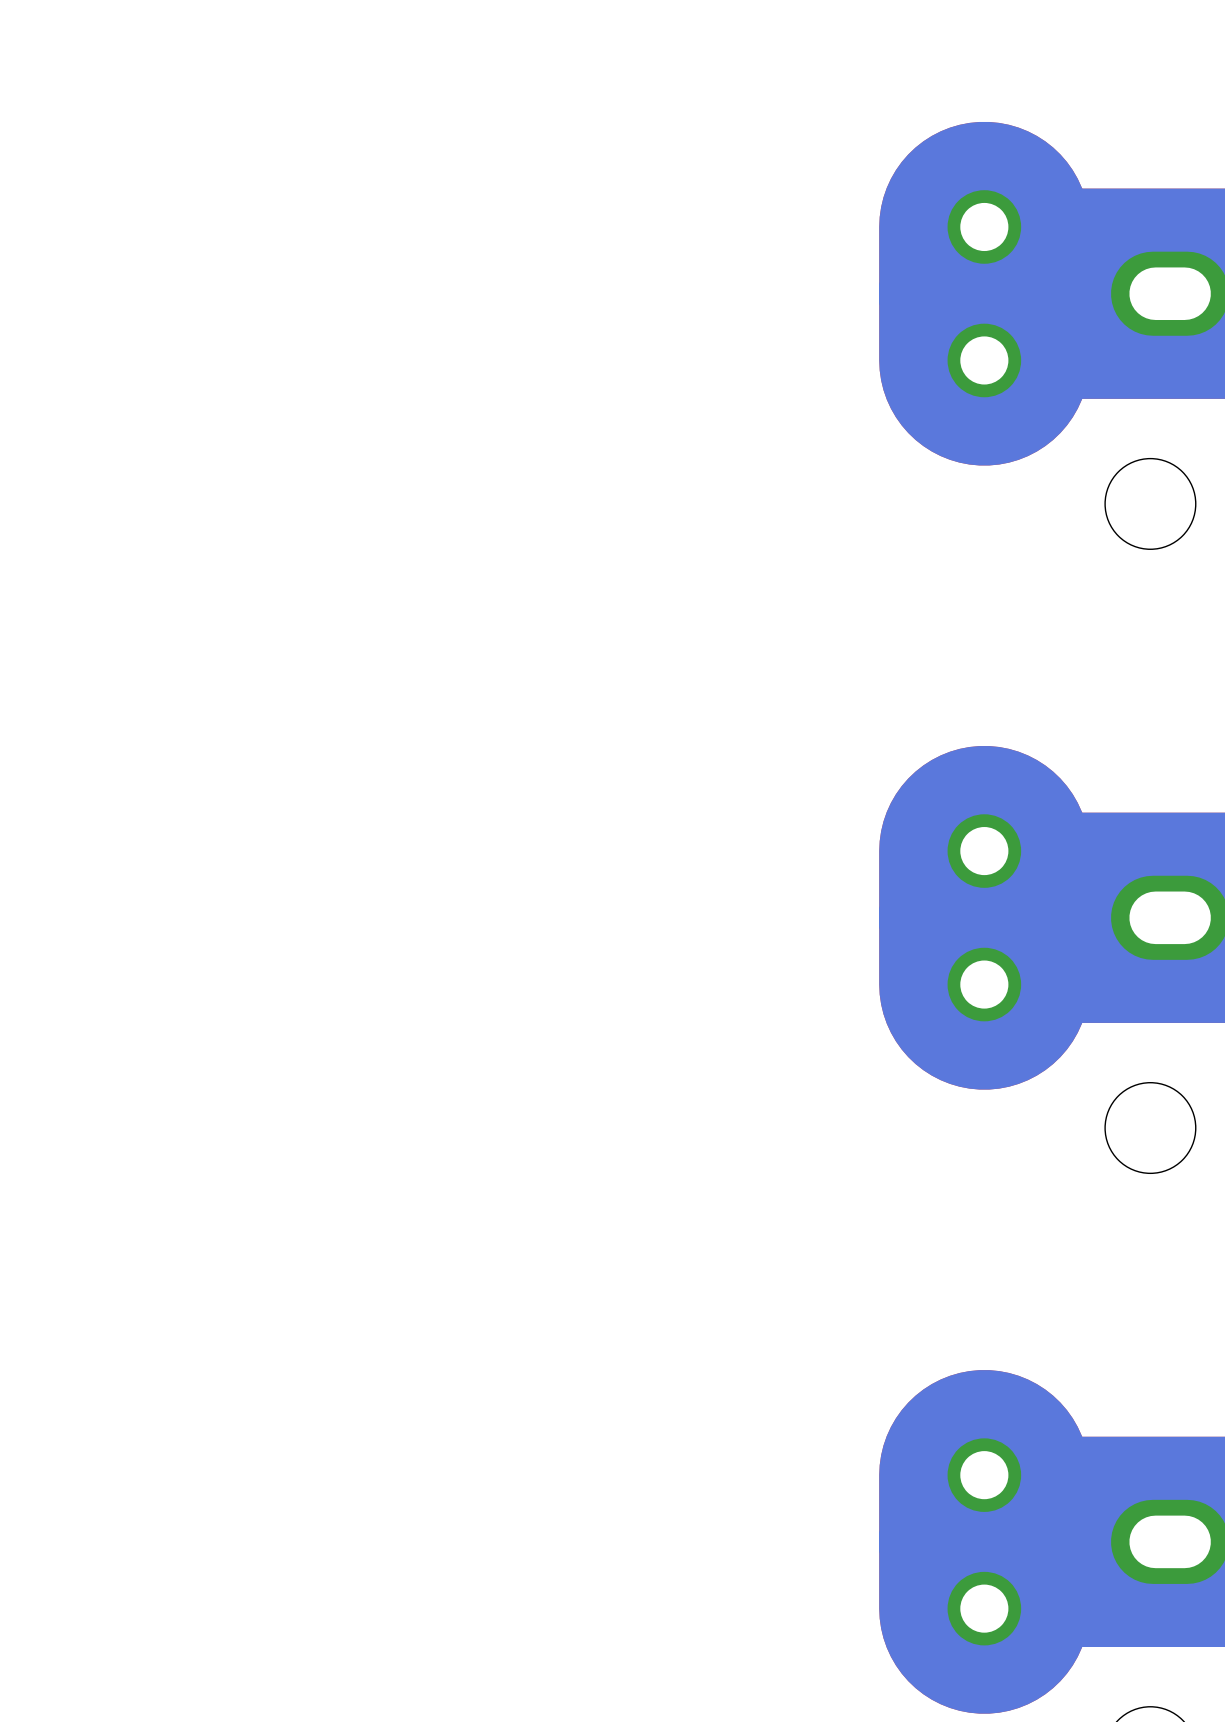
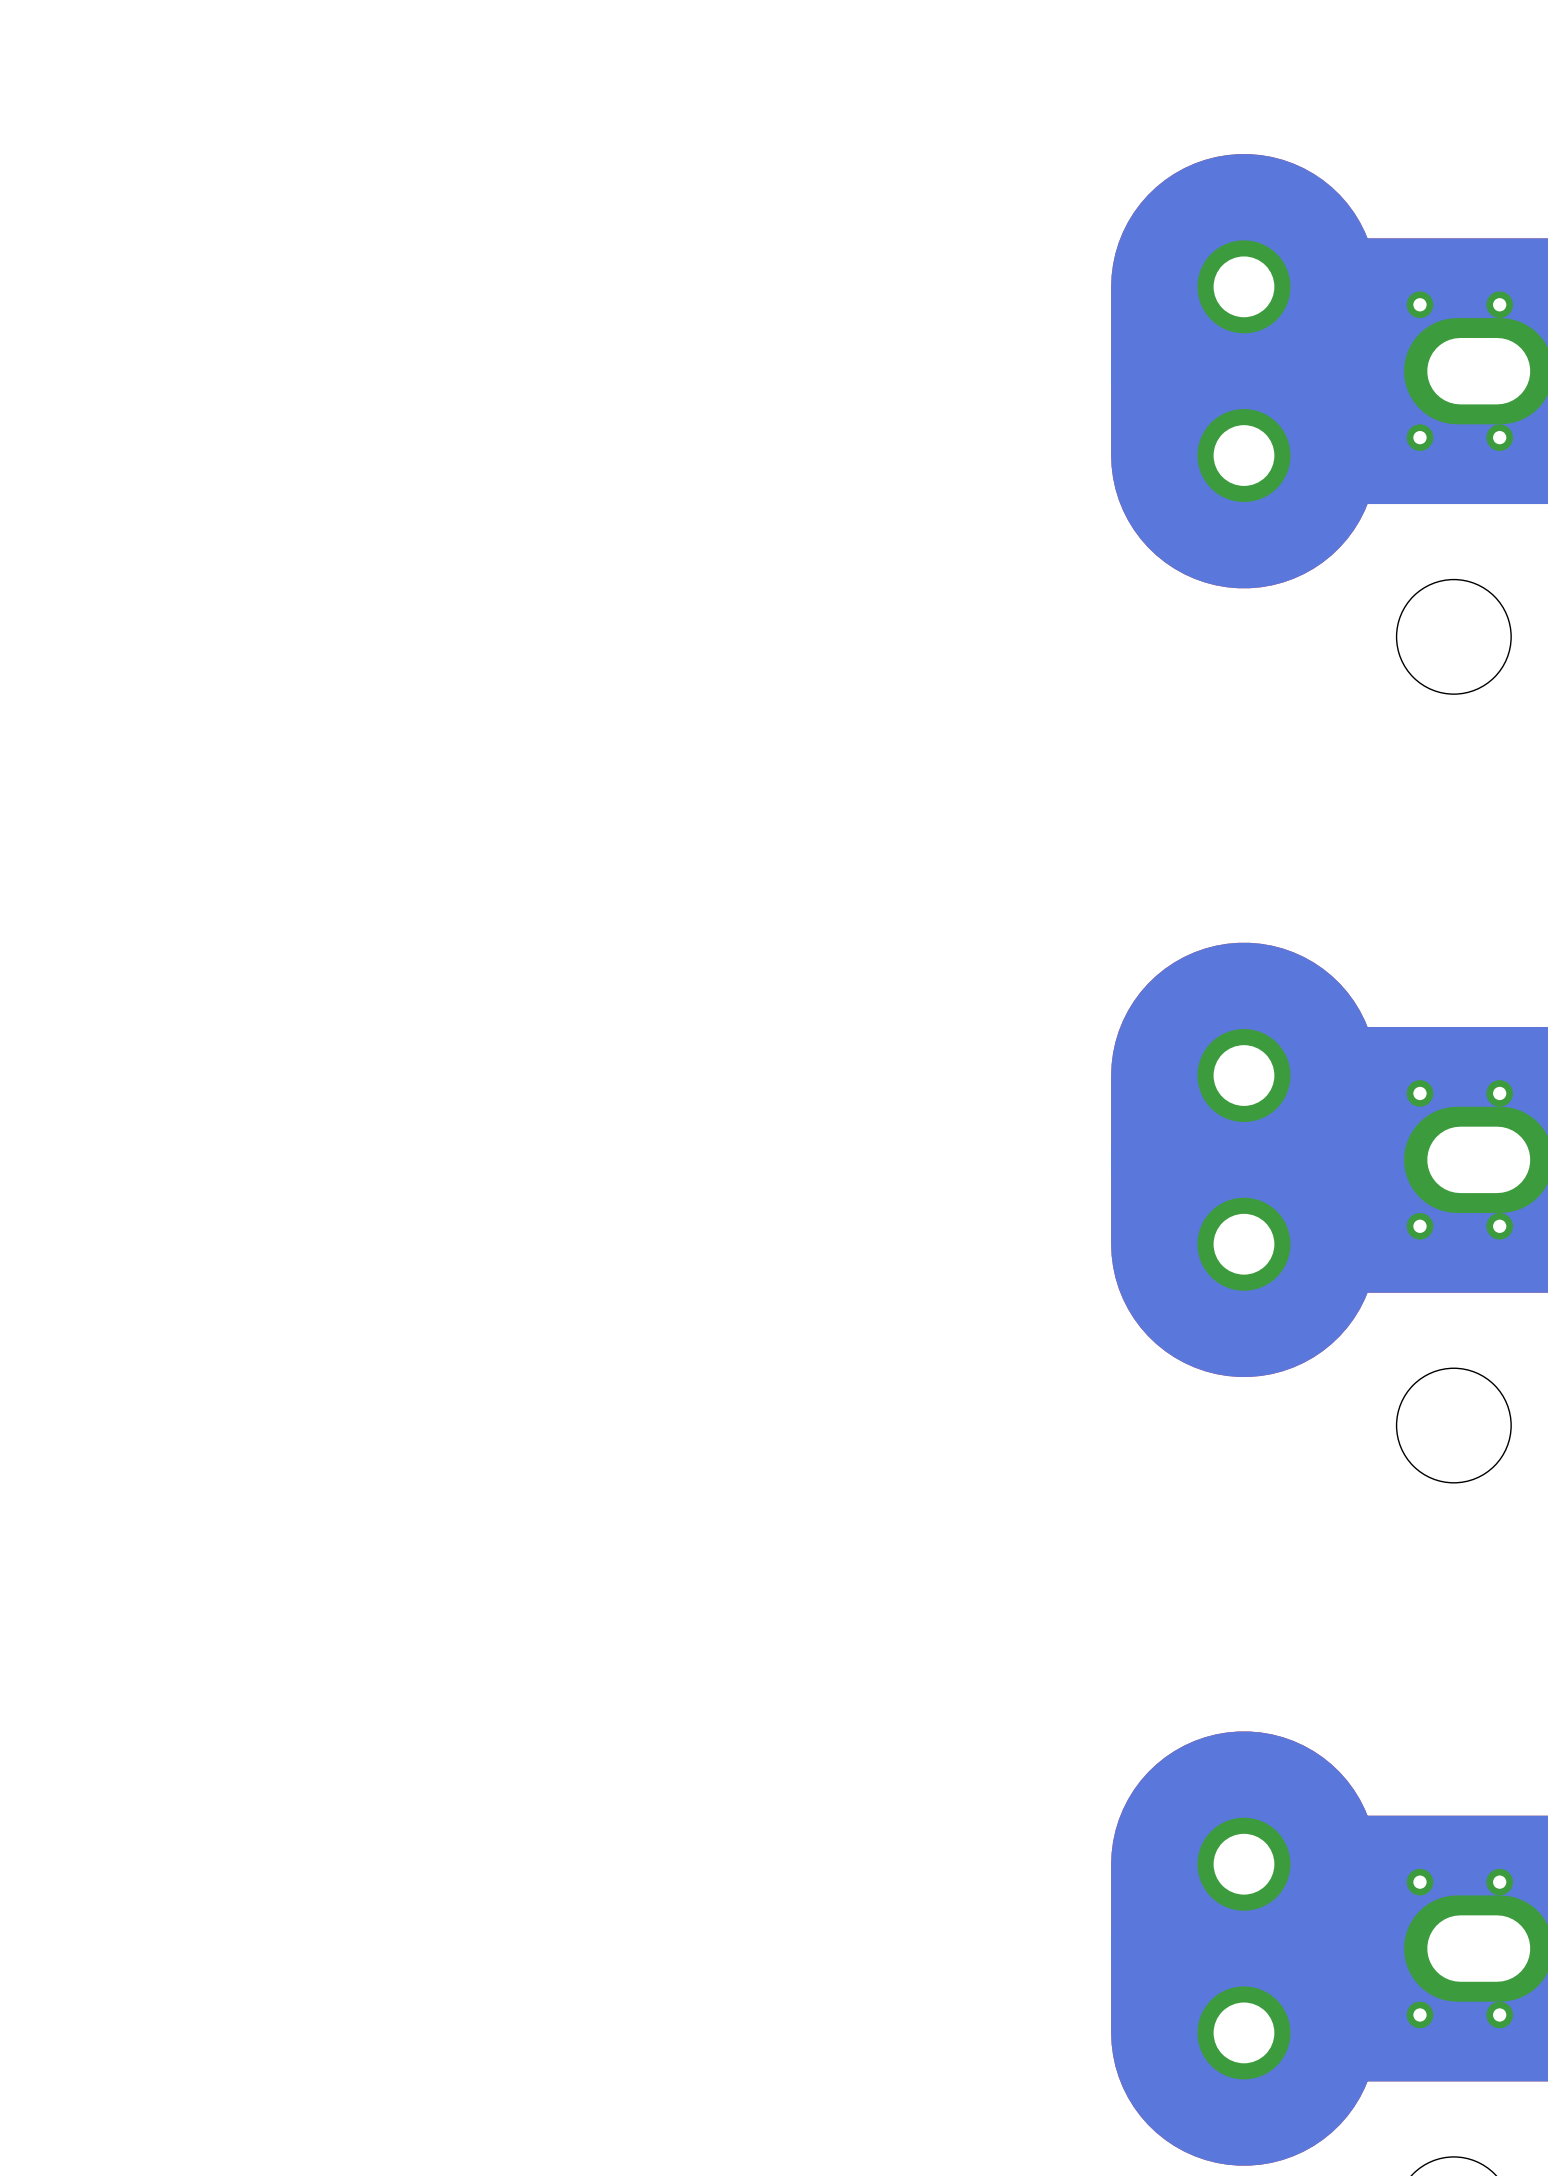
via: none -> (1419, 304)
via: none -> (1499, 304)
via: none -> (1419, 437)
via: none -> (1499, 437)
via: none -> (1419, 1093)
via: none -> (1499, 1093)
via: none -> (1419, 1226)
via: none -> (1499, 1226)
via: none -> (1419, 1882)
via: none -> (1499, 1882)
via: none -> (1419, 2014)
via: none -> (1499, 2014)

